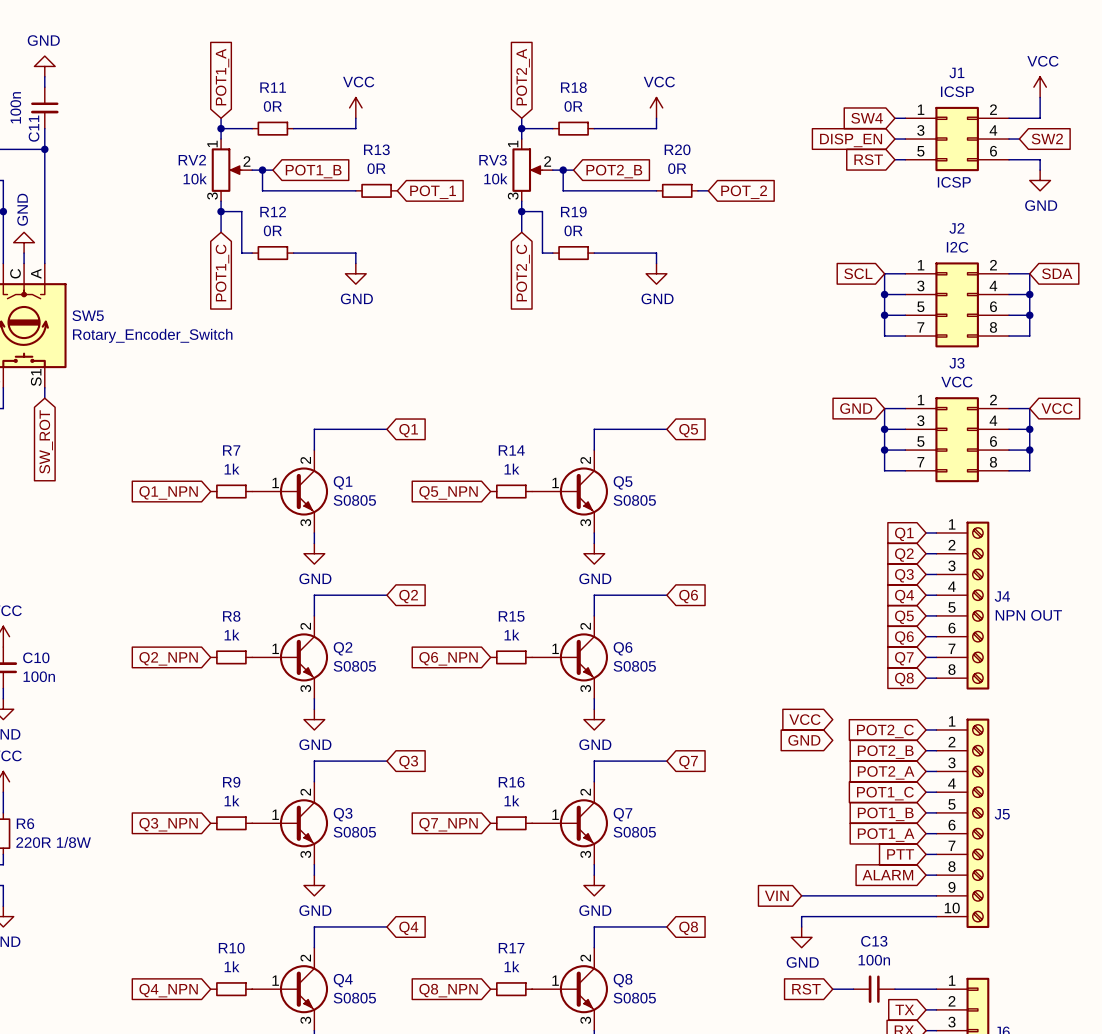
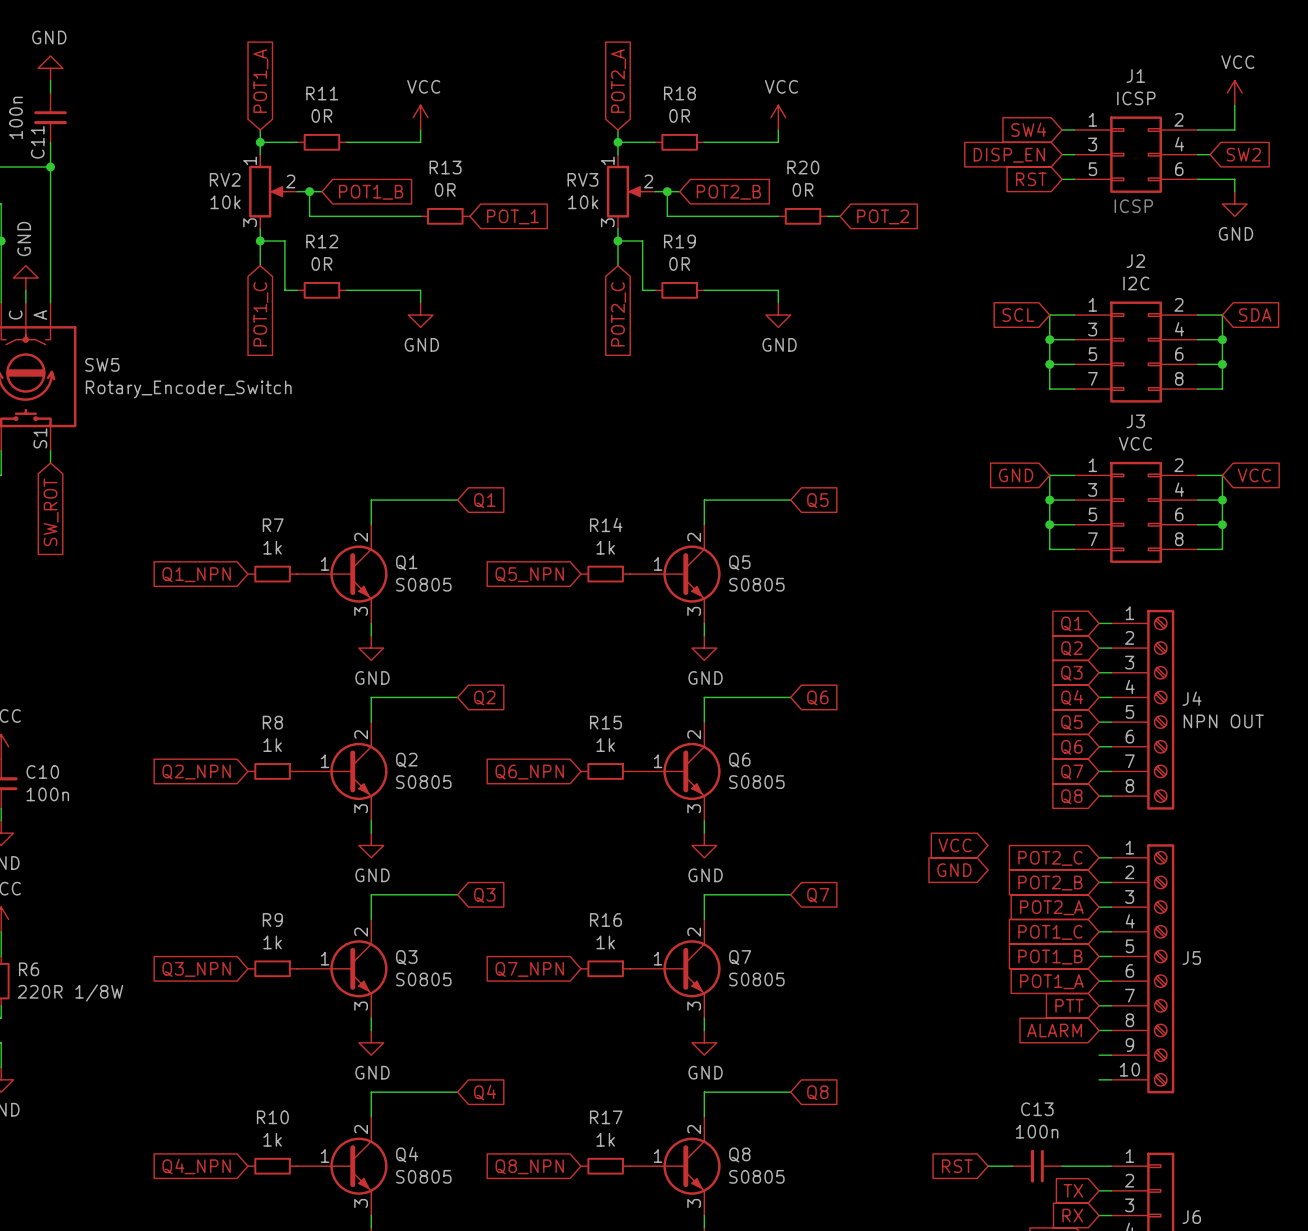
global label: VIN (776, 895) -> none
wire: (801, 895) (926, 895) -> none
wire: (926, 916) (801, 916) (801, 926) -> none
power symbol: GND (801, 937) -> none

